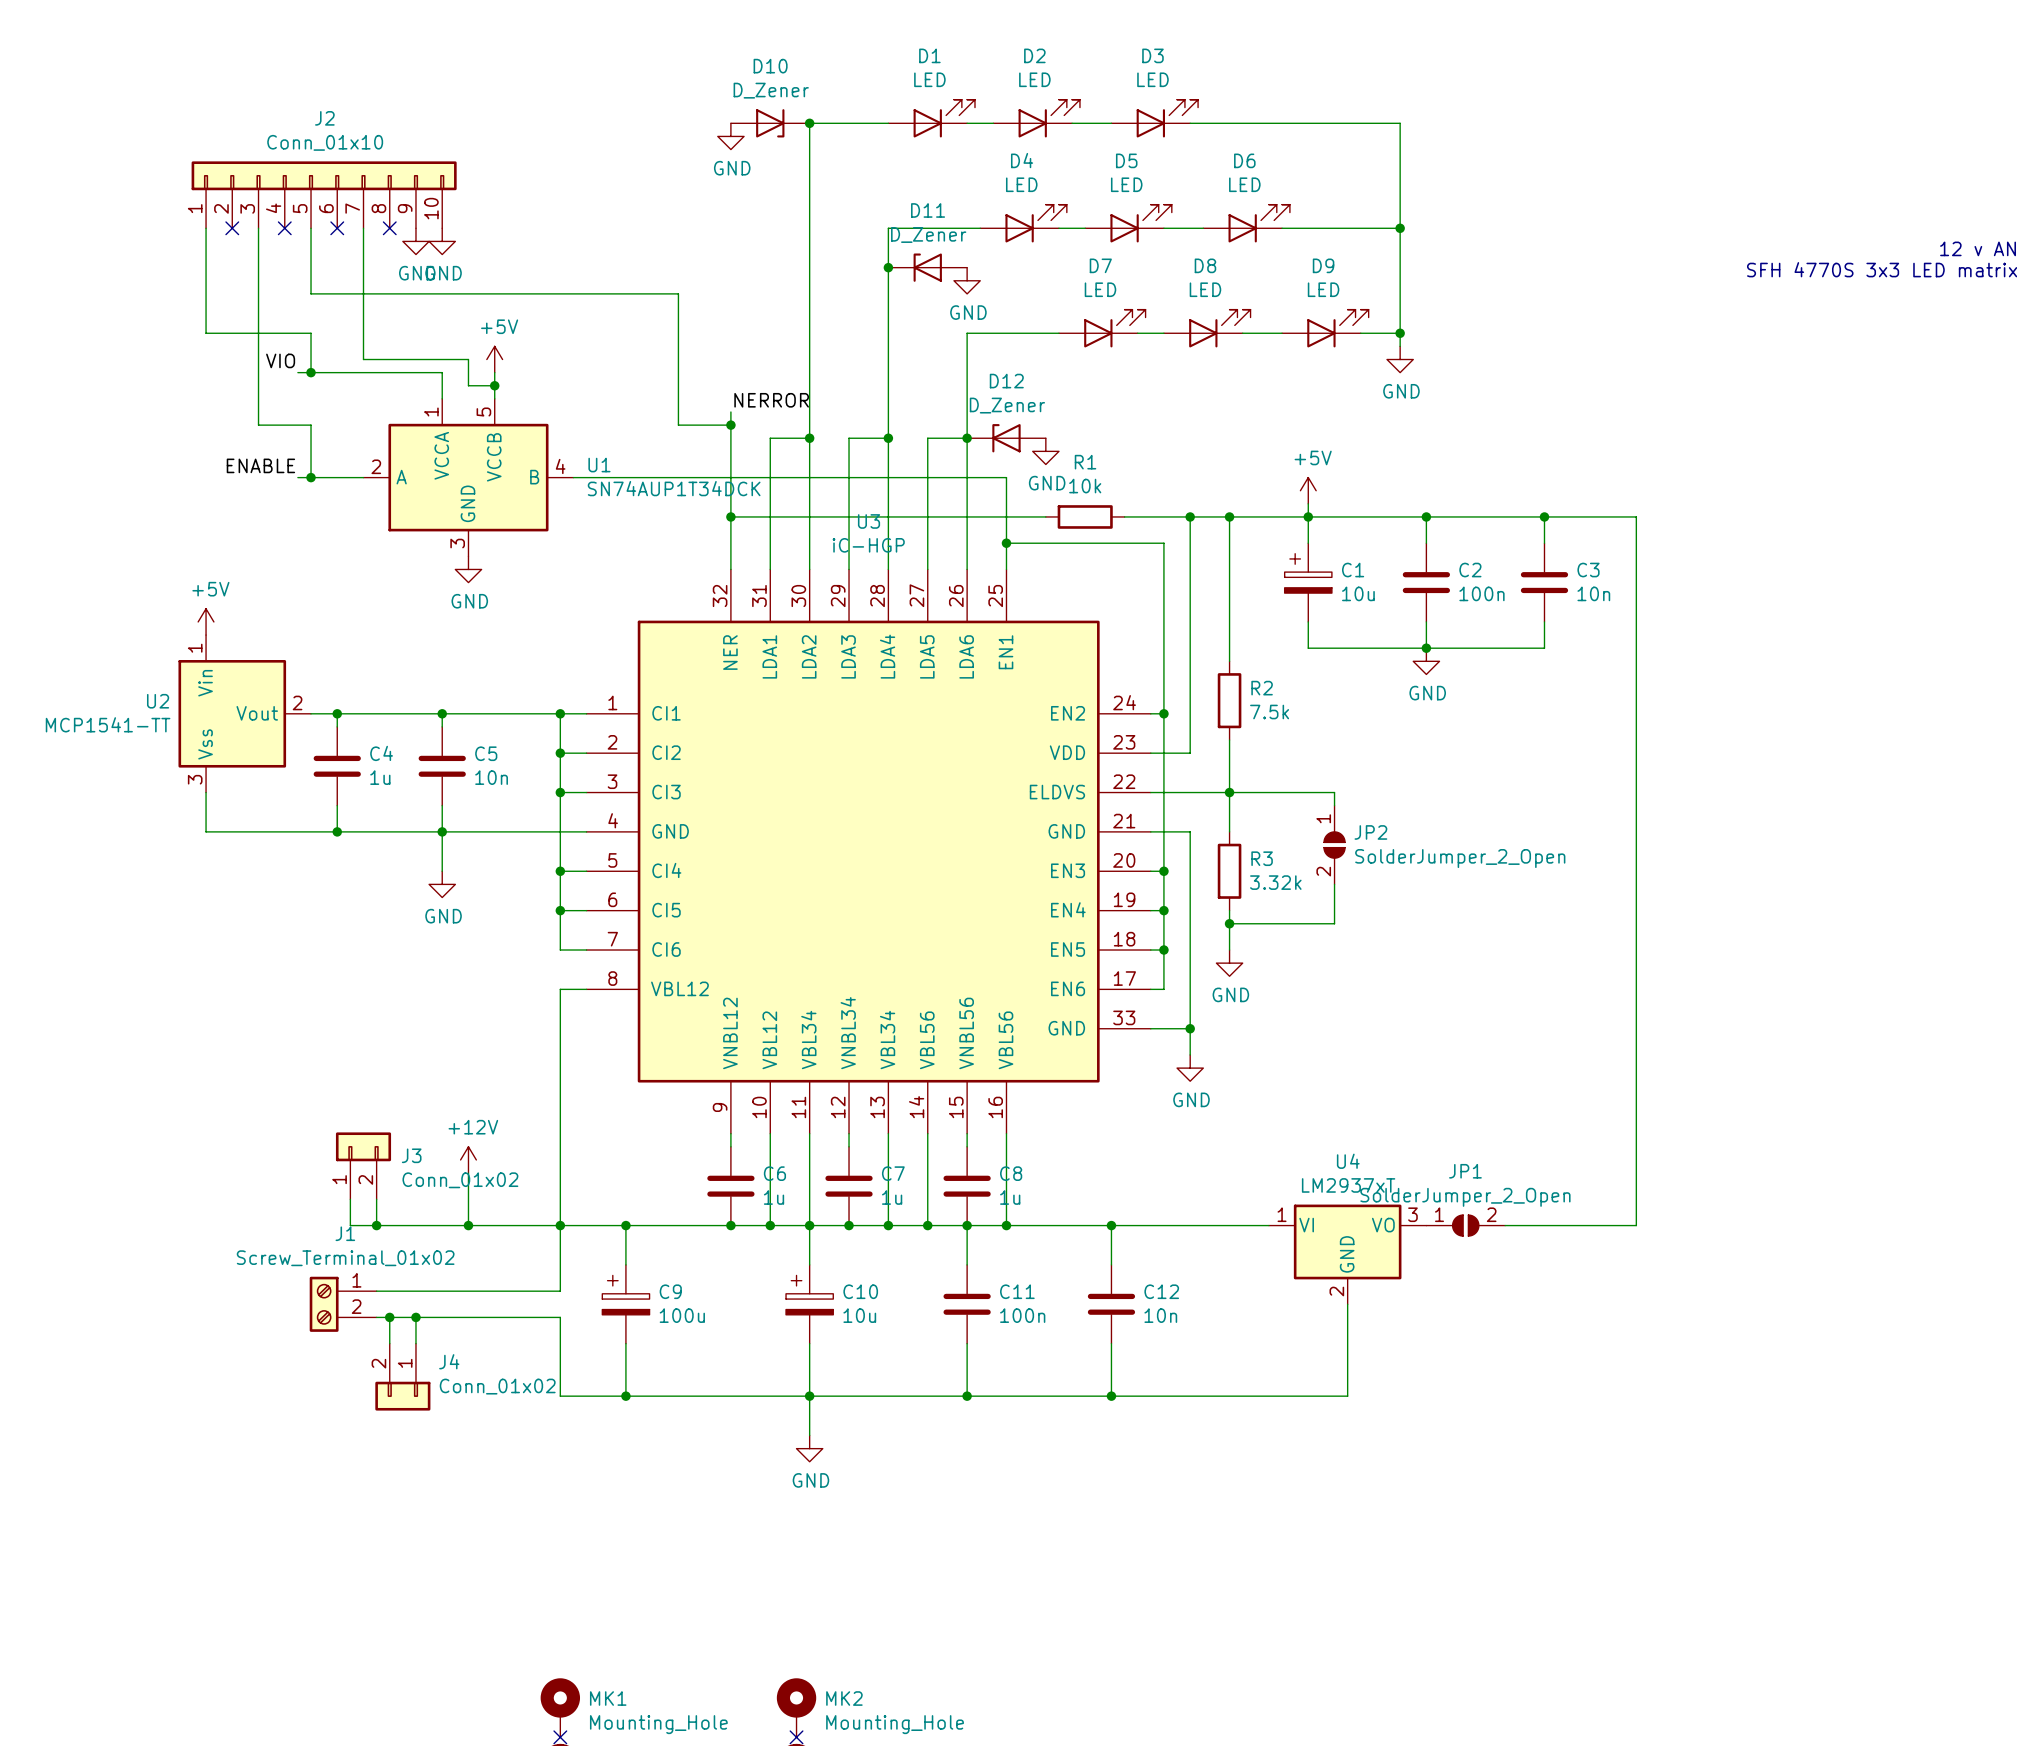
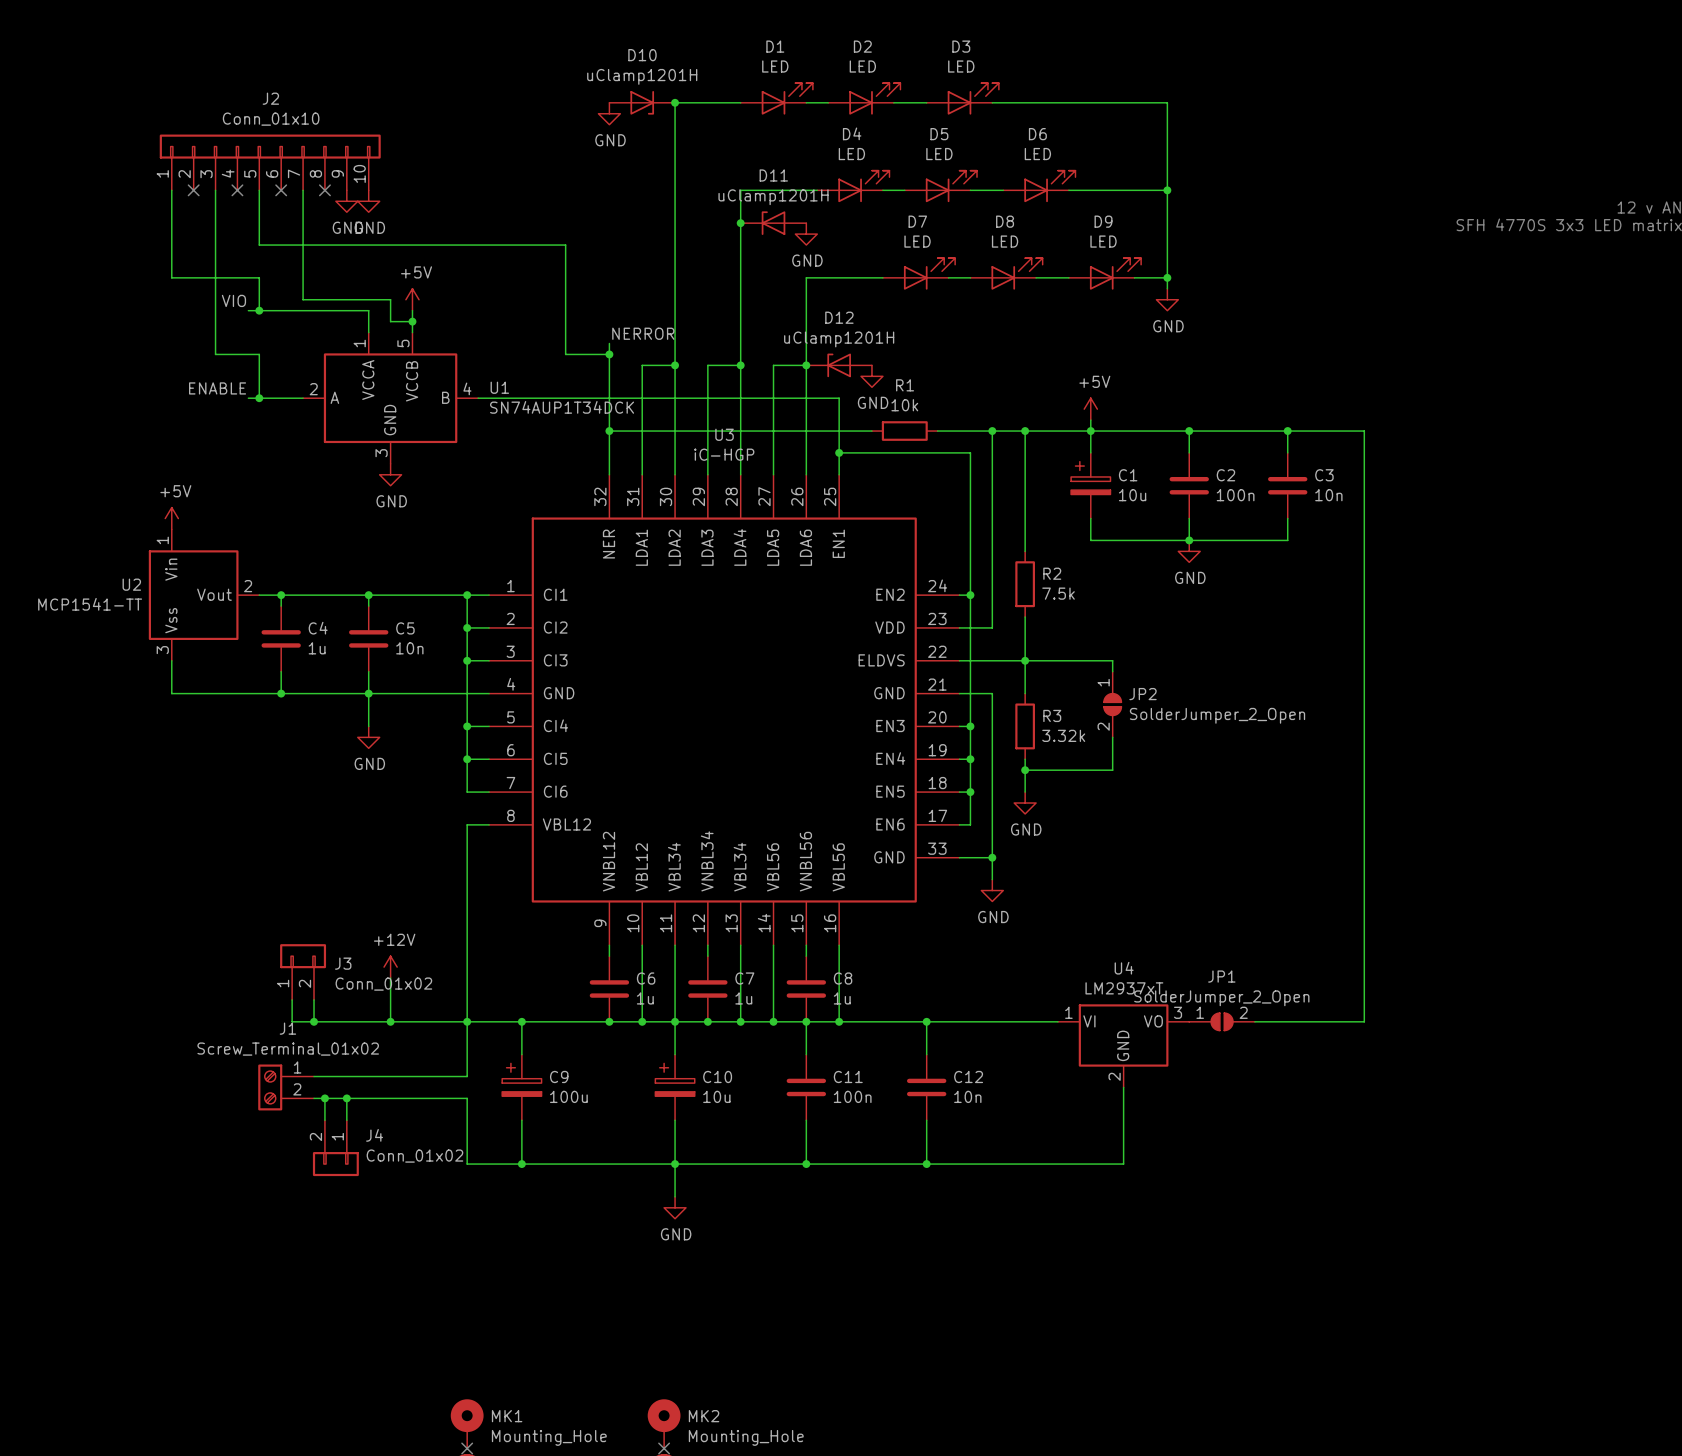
D10 value: D_Zener (771, 90) -> uClamp1201H (642, 76)
D11 value: D_Zener (928, 234) -> uClamp1201H (773, 197)
D12 value: D_Zener (1007, 405) -> uClamp1201H (839, 339)

